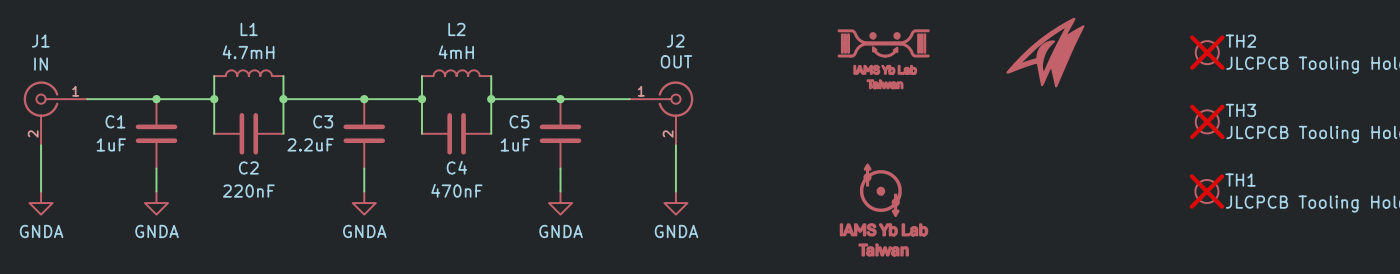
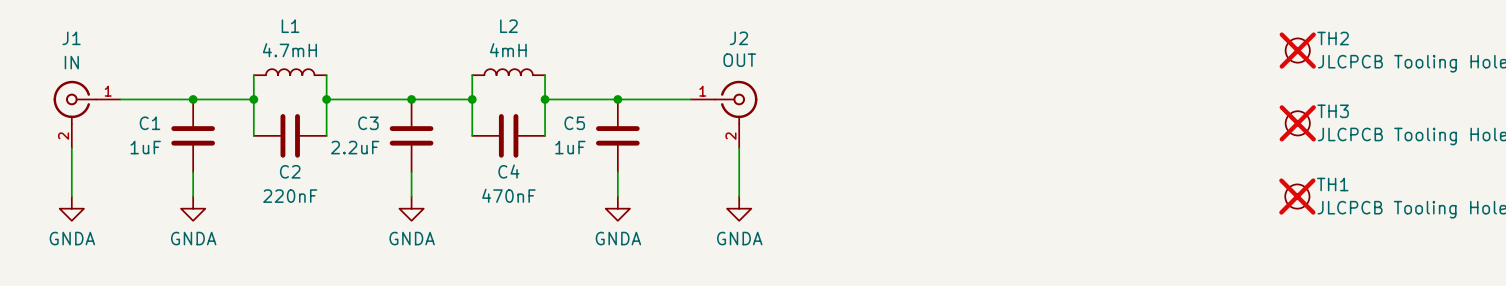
part: (1045, 52) -> none
part: (883, 59) -> none
part: (884, 210) -> none

